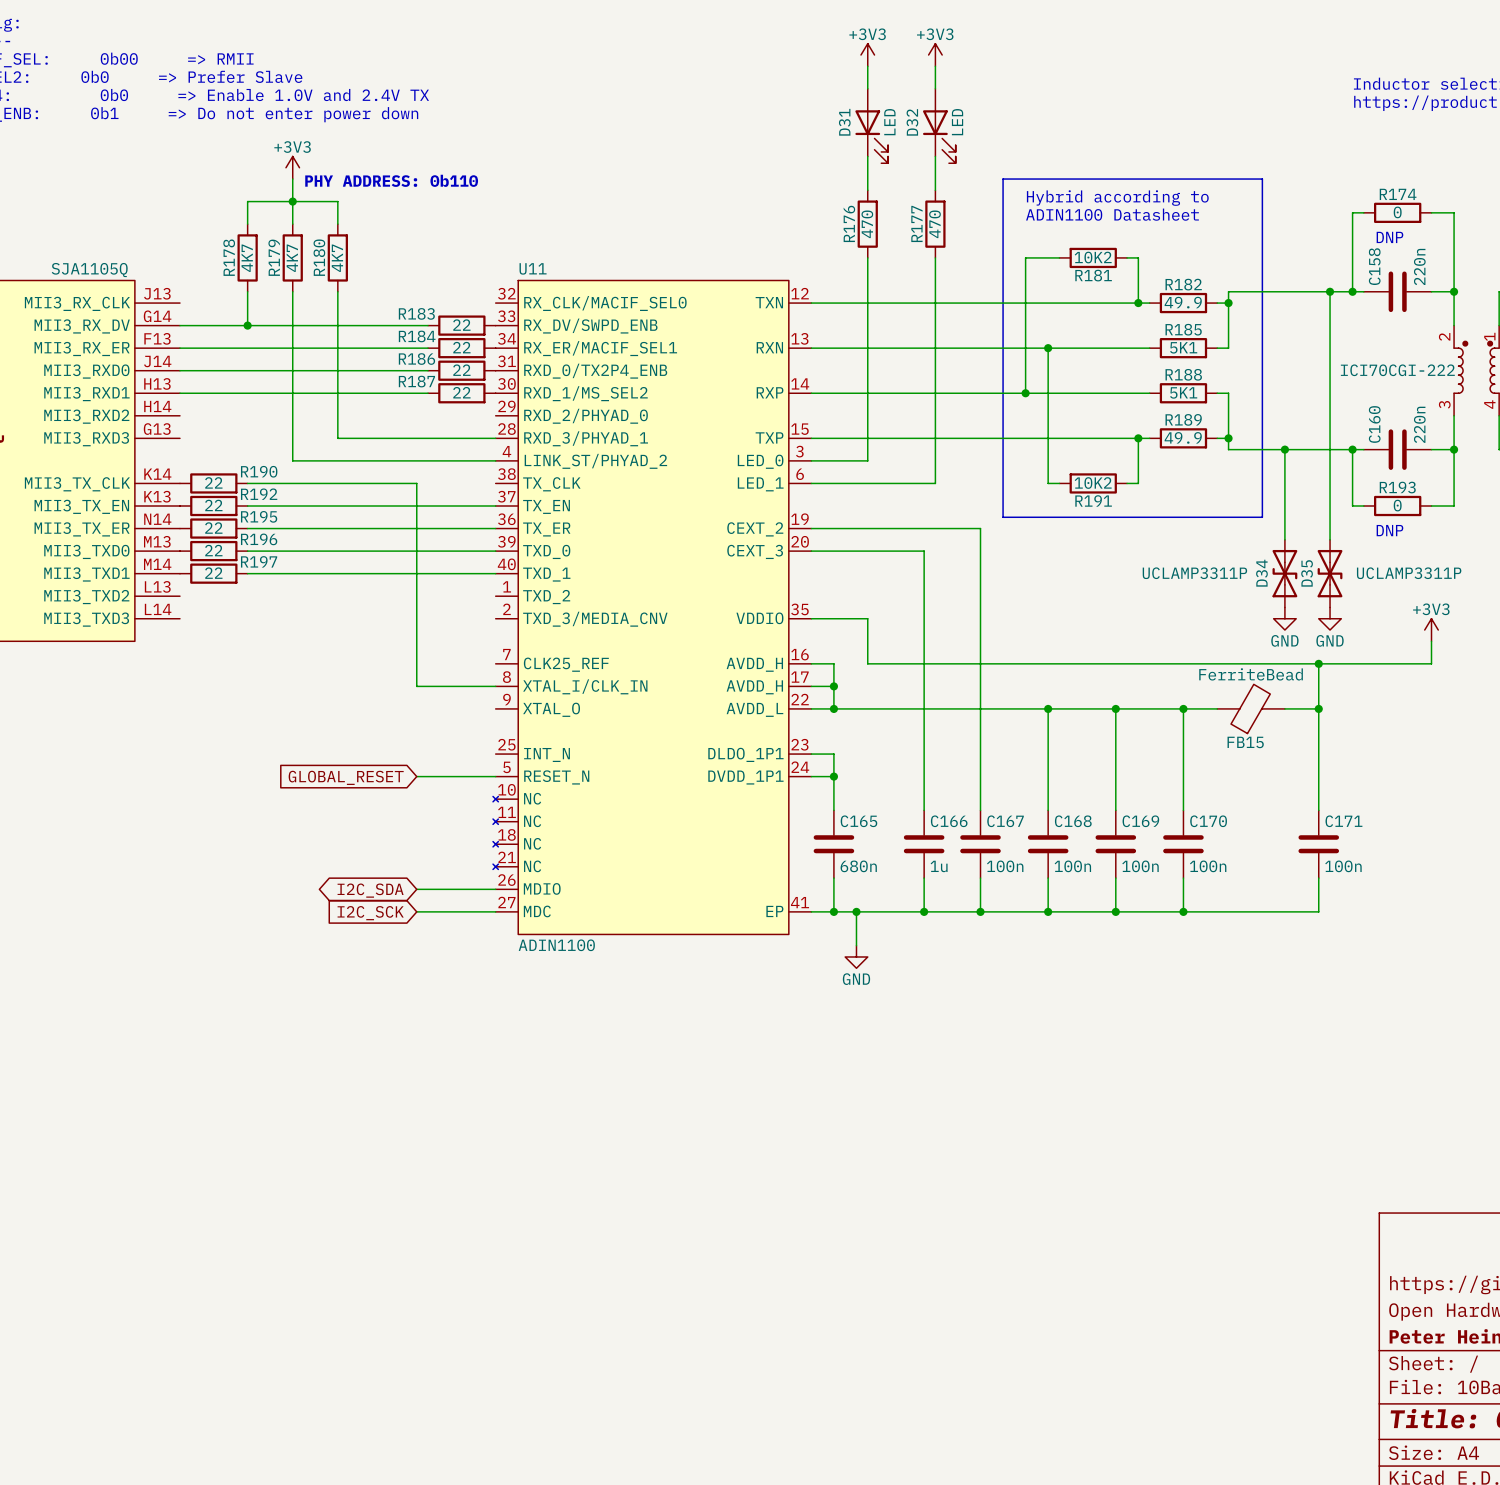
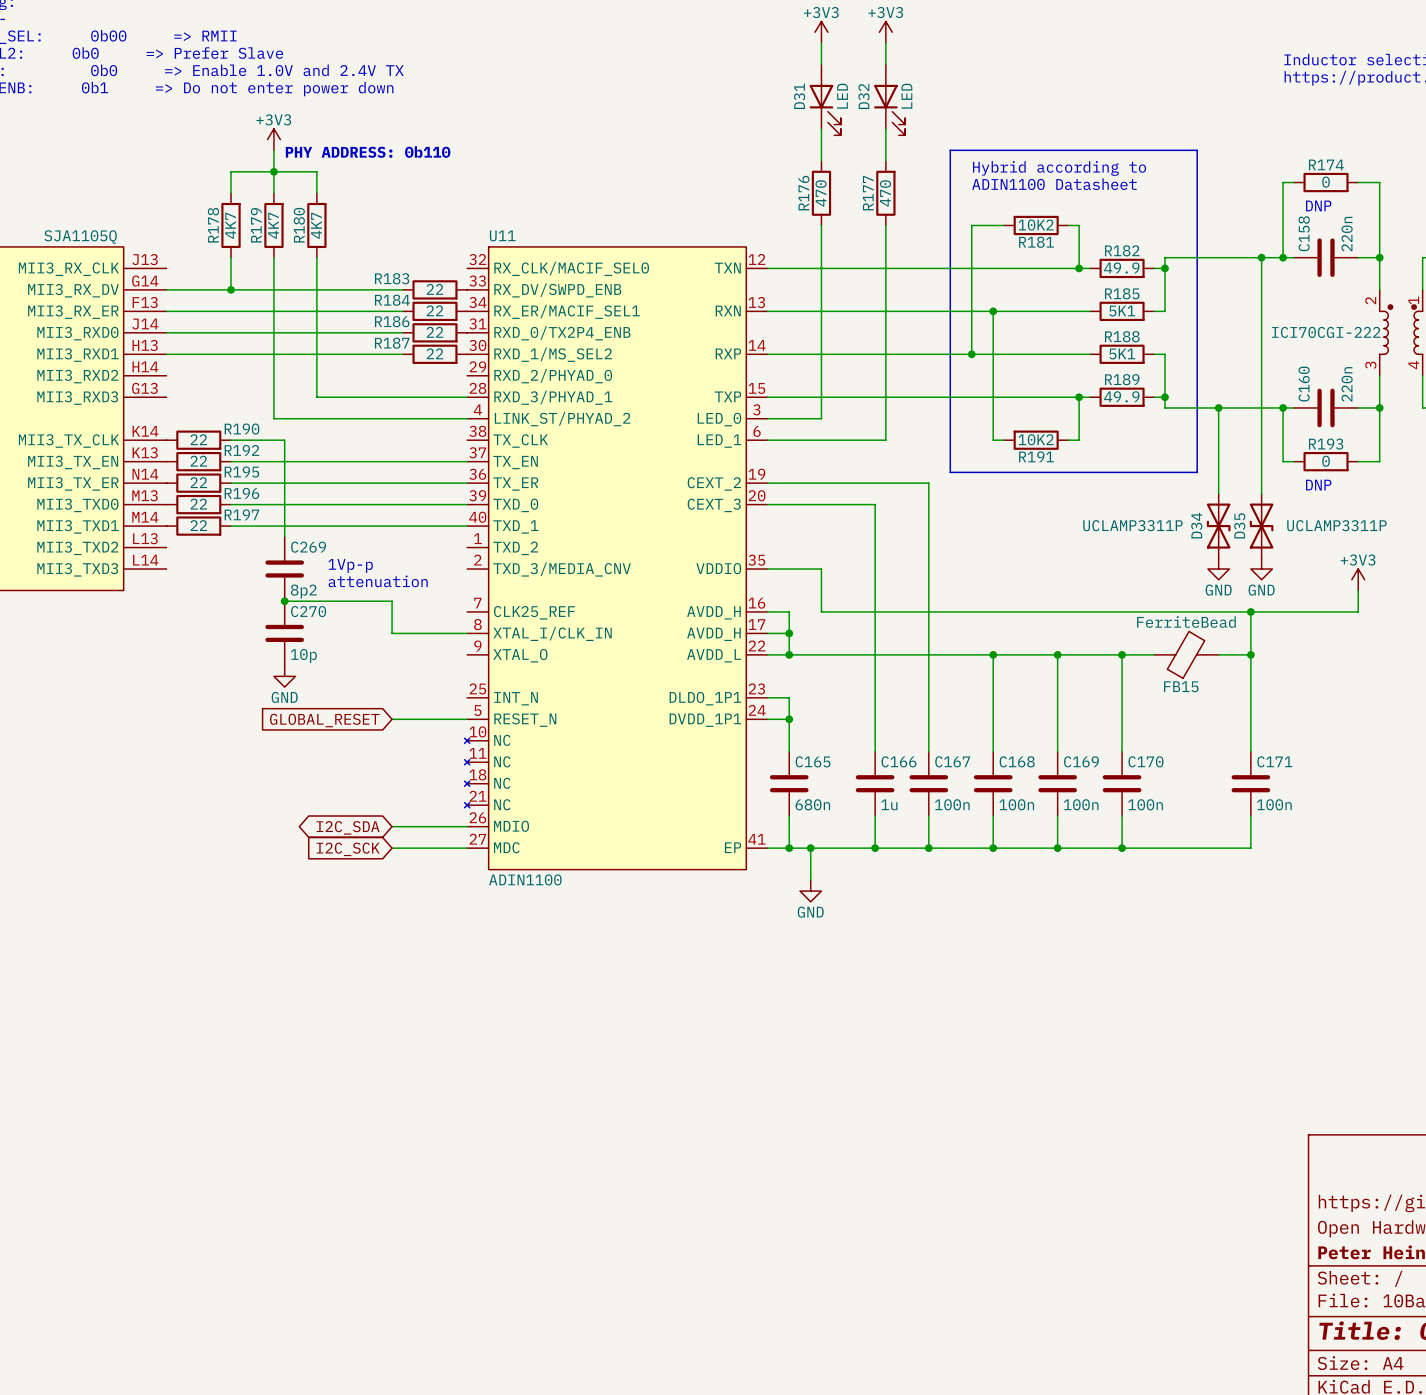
wire: (304, 483) (416, 483) (416, 652) -> (284, 440) (284, 536)
text: none -> 1Vp-p (350, 565)
C269: none -> 8p2 (284, 569)
text: none -> attenuation (378, 581)
wire: none -> (284, 601) (392, 601)
junction: none -> (284, 601)
C270: none -> 10p (284, 633)
power symbol: none -> GND (284, 676)

